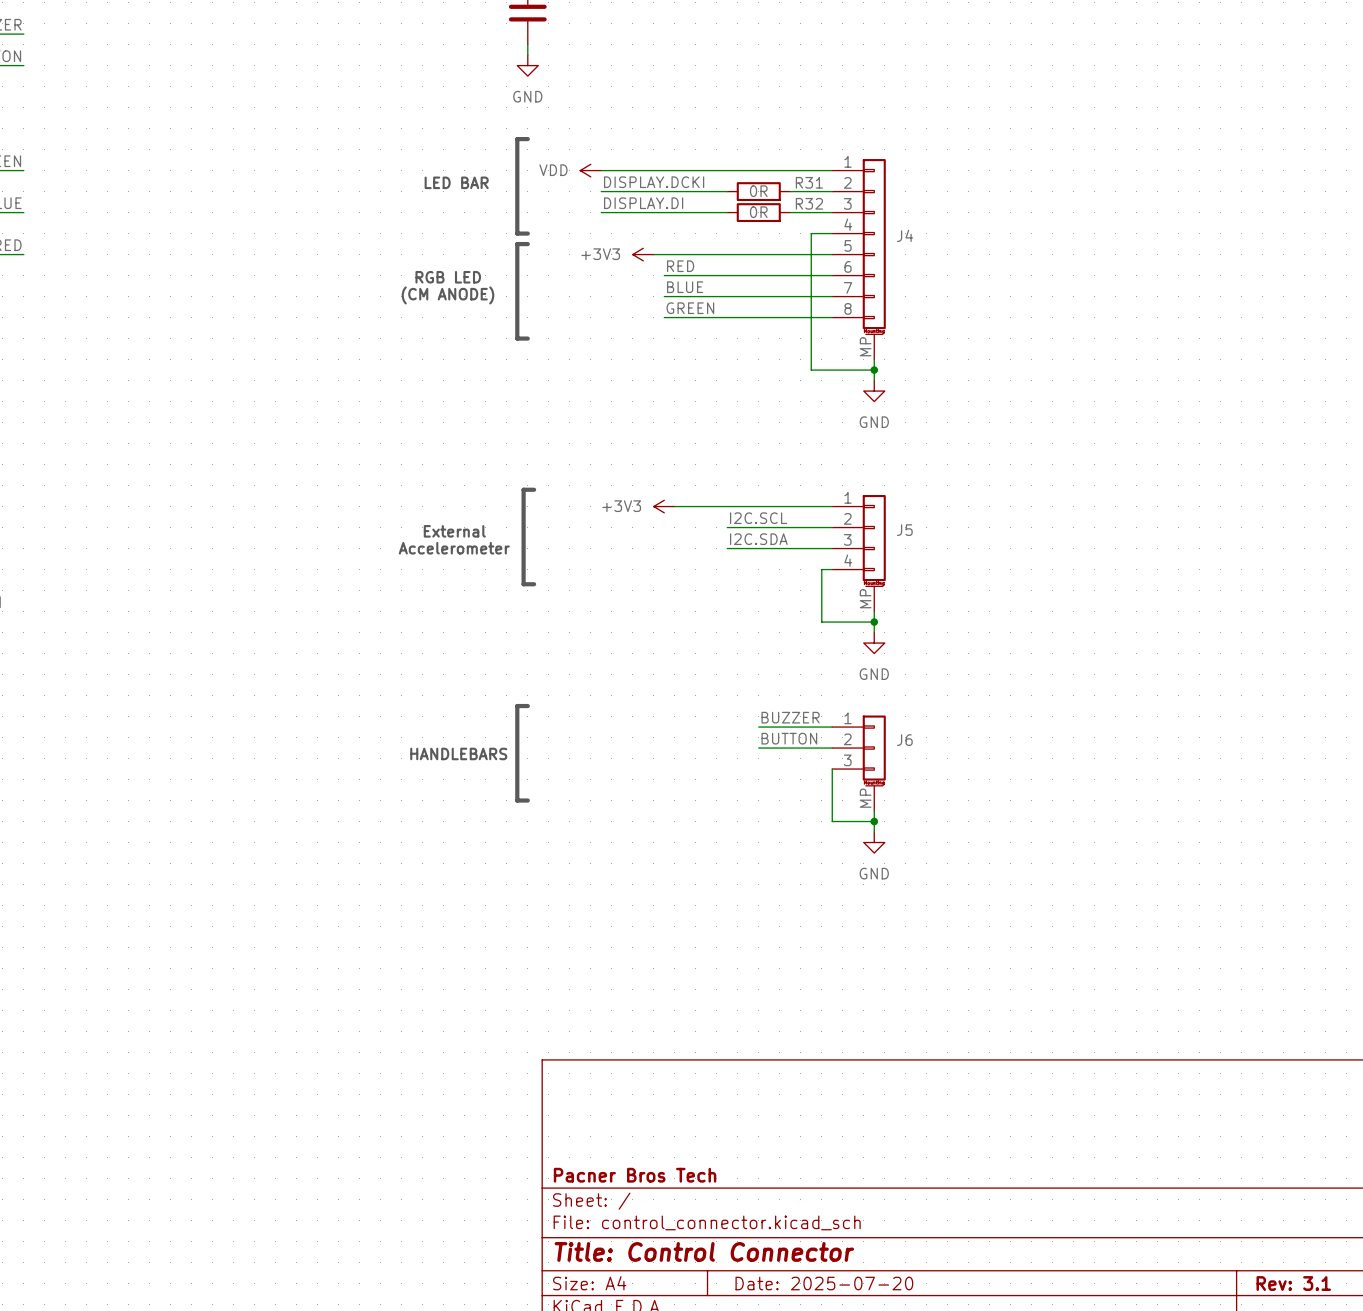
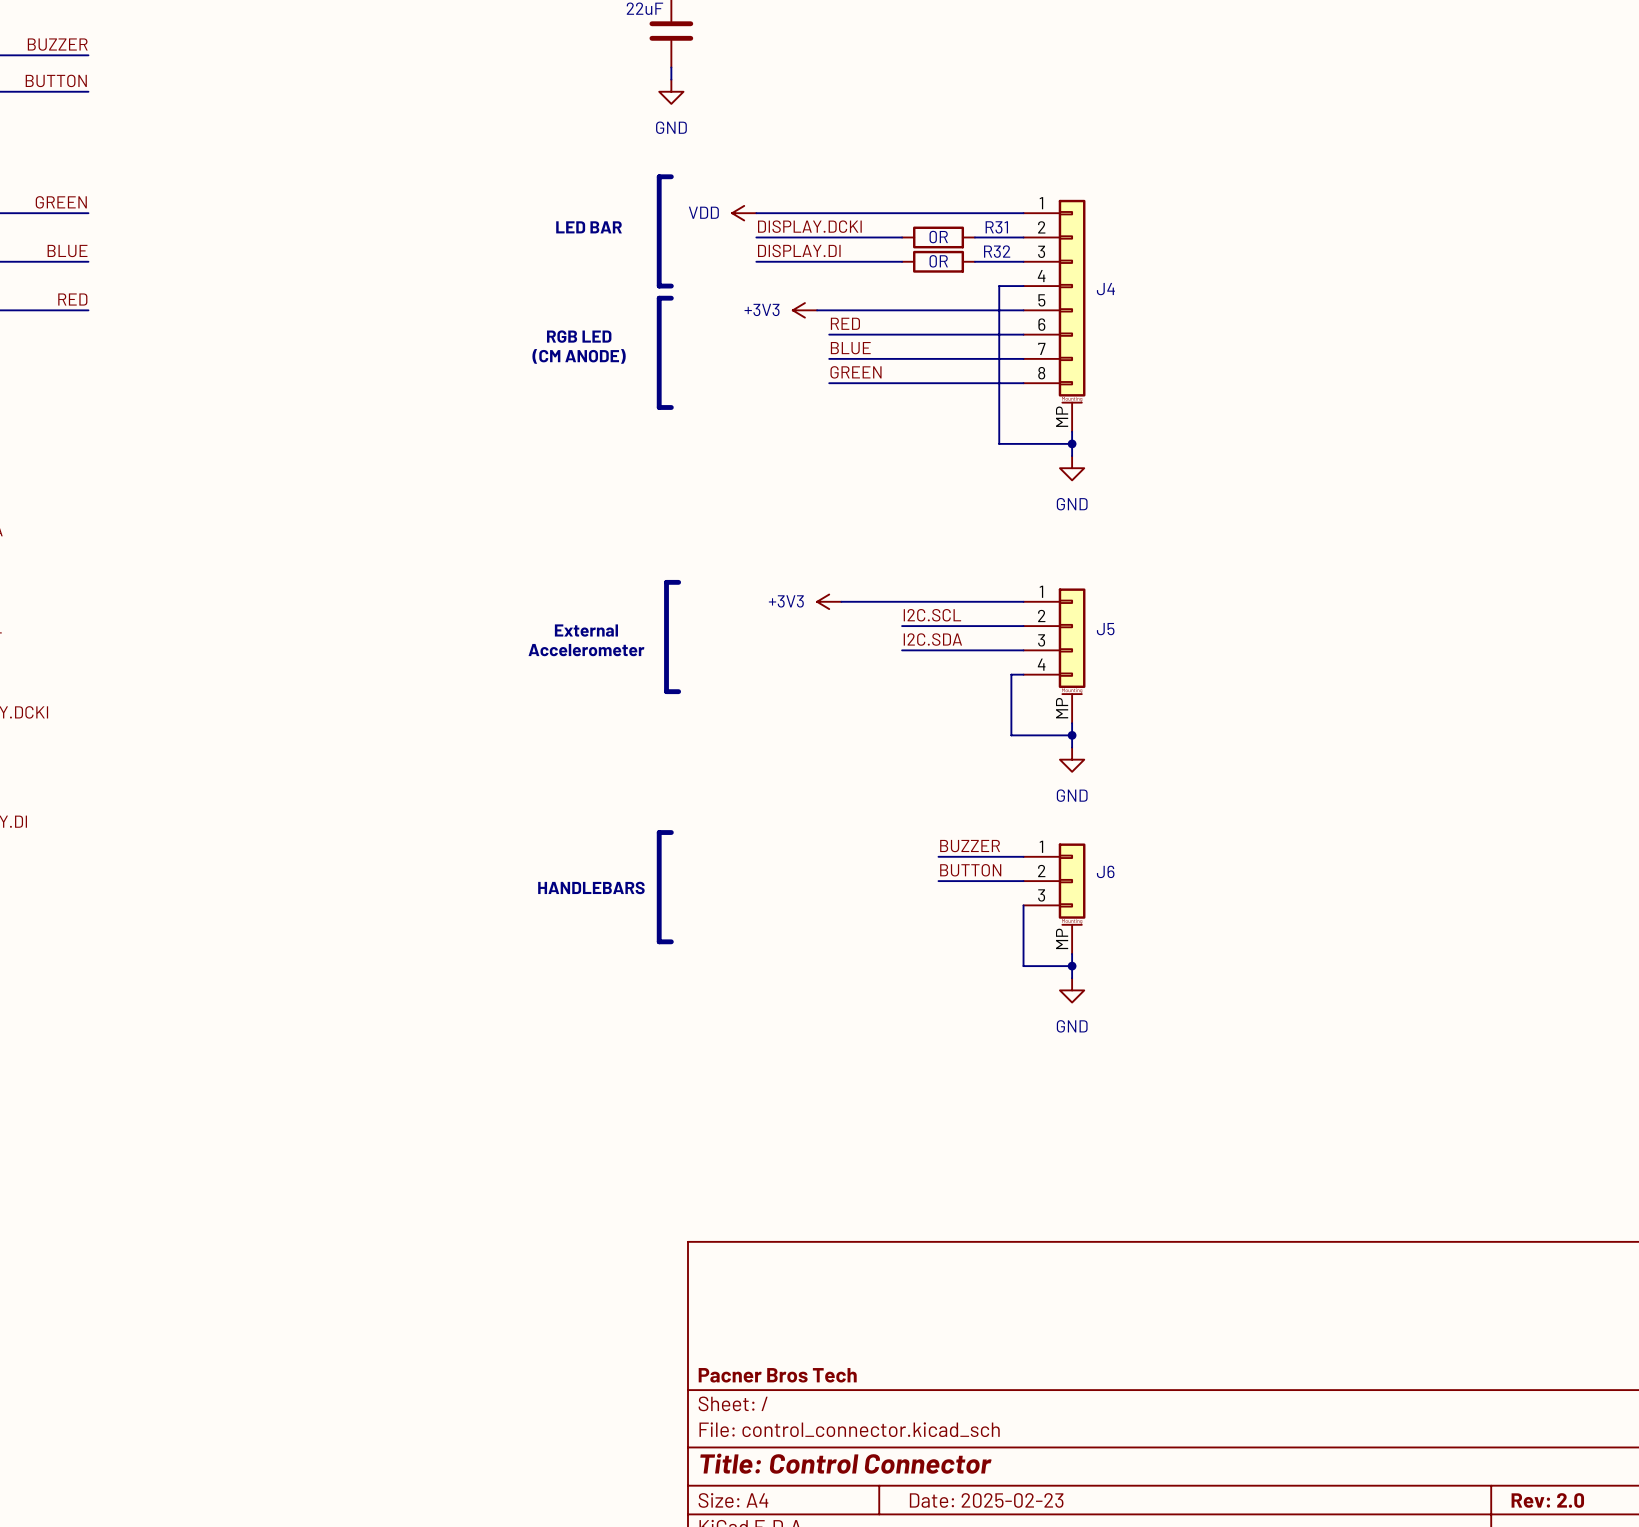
title block: Date: 2025-07-20 (824, 1283) -> Date: 2025-02-23 (986, 1500)
title block: Rev: 3.1 (1293, 1283) -> Rev: 2.0 (1547, 1500)

